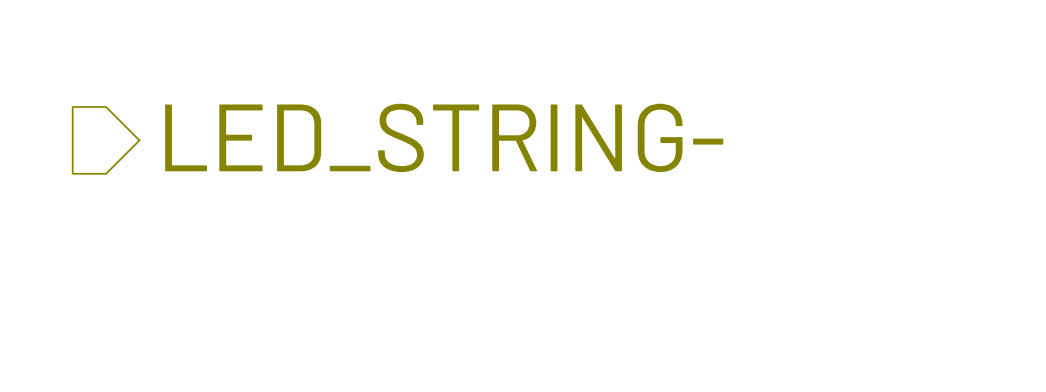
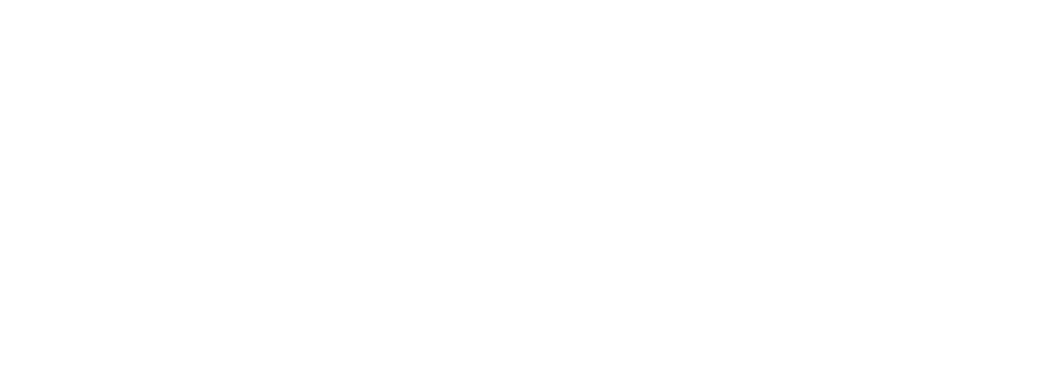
hierarchical label: LED_STRING- (444, 137) -> none

